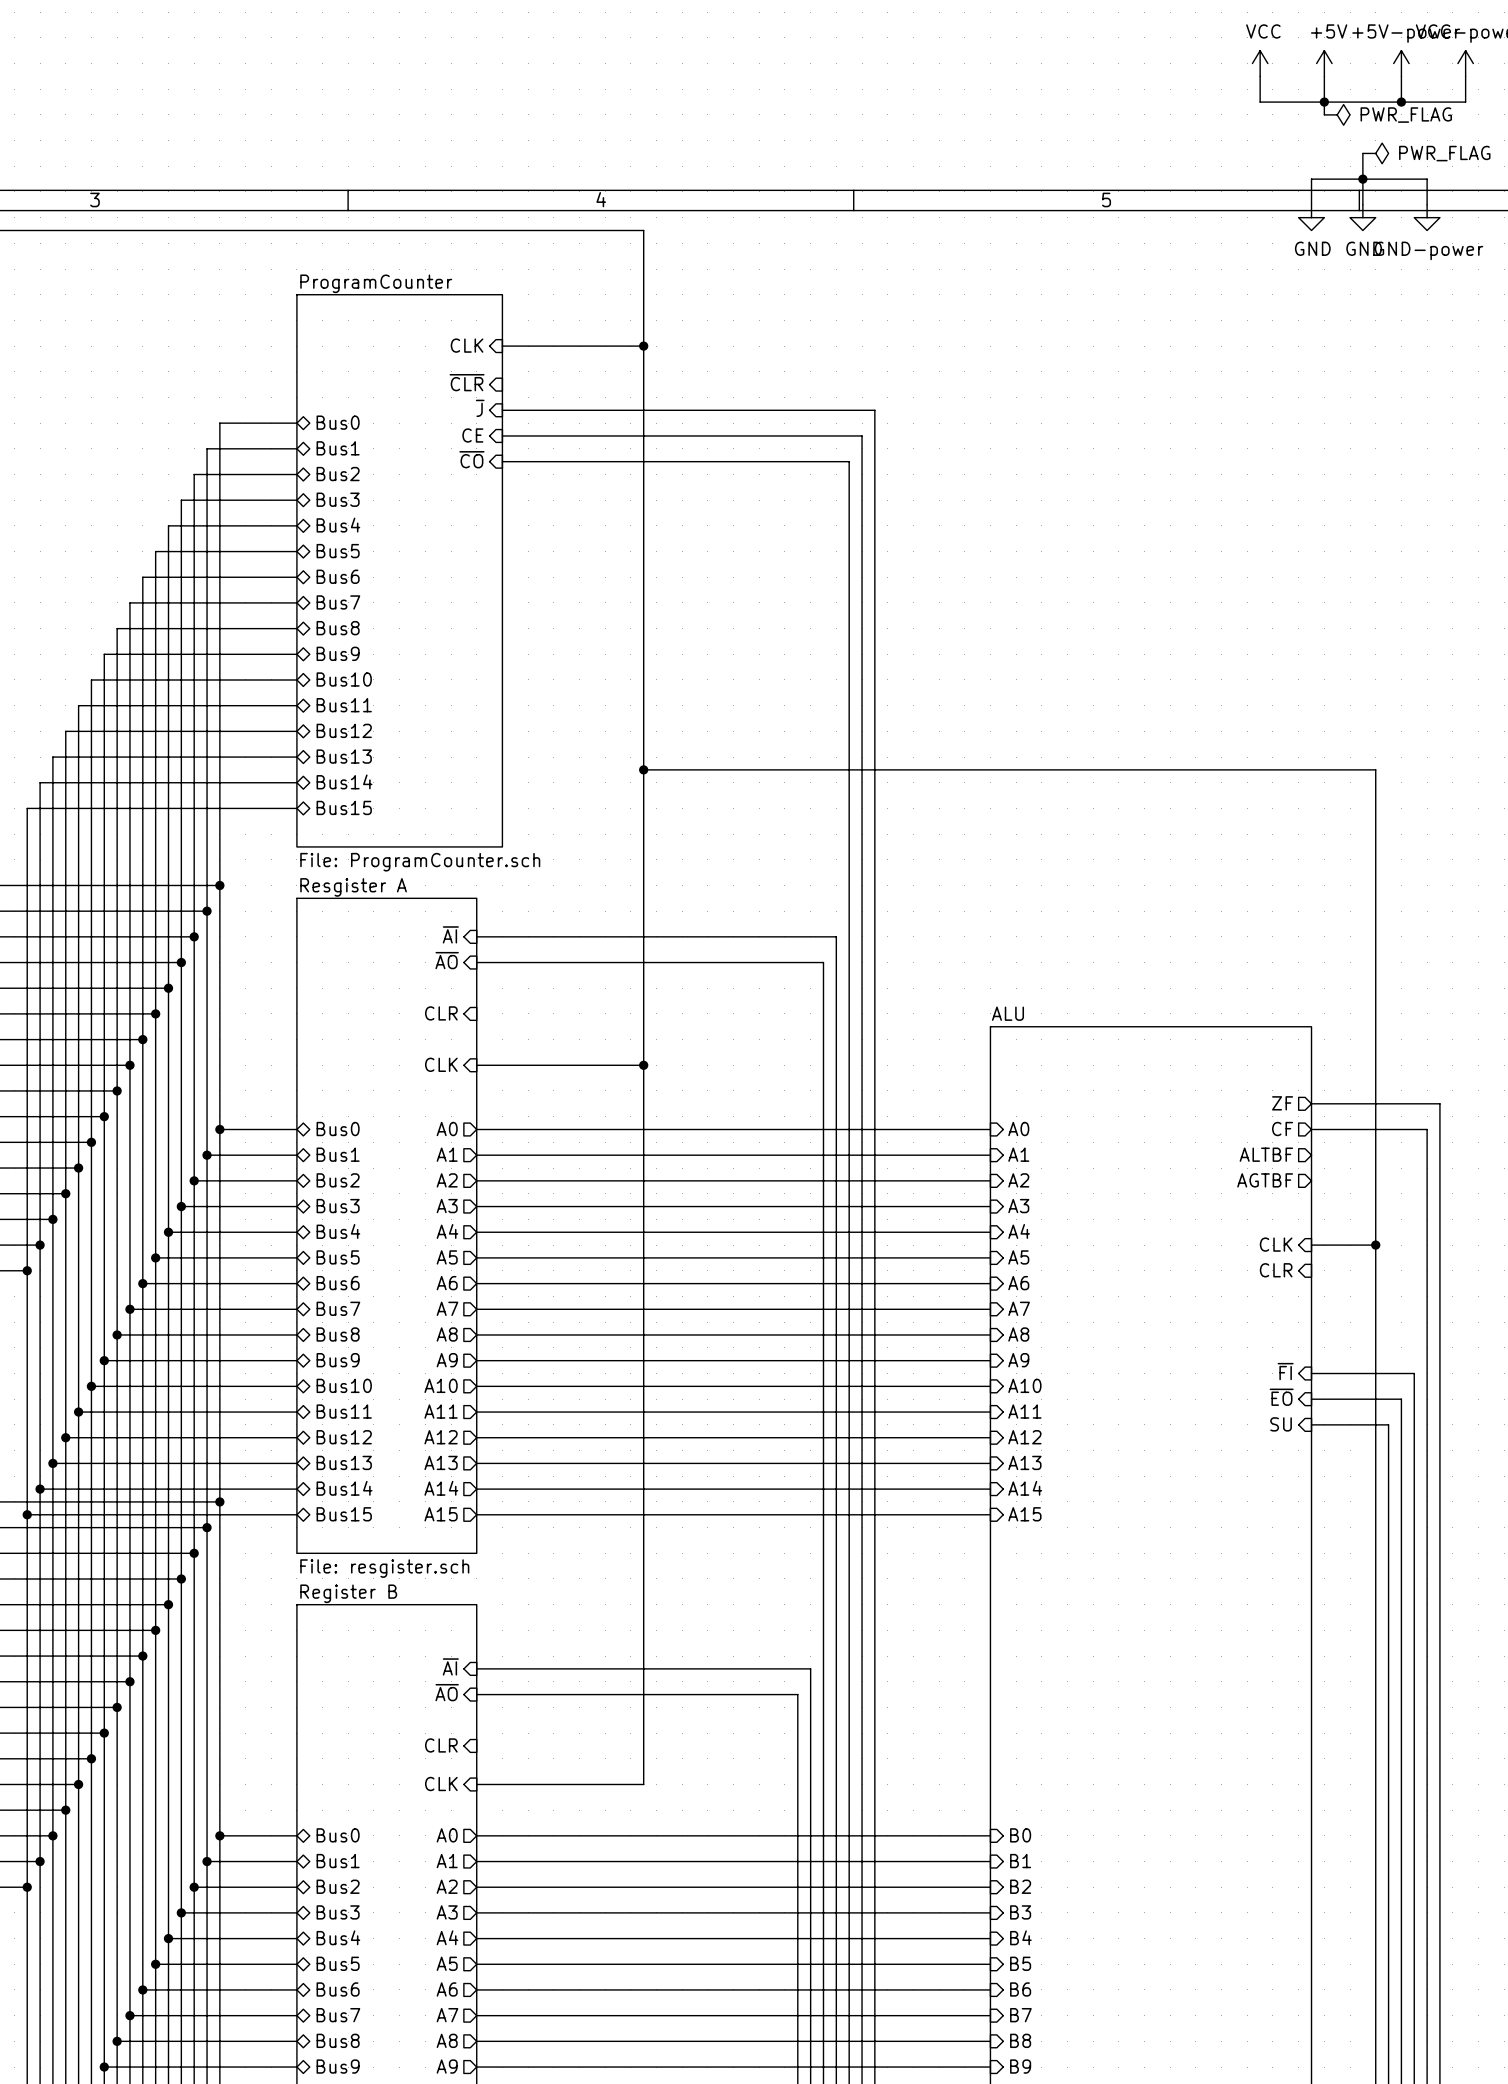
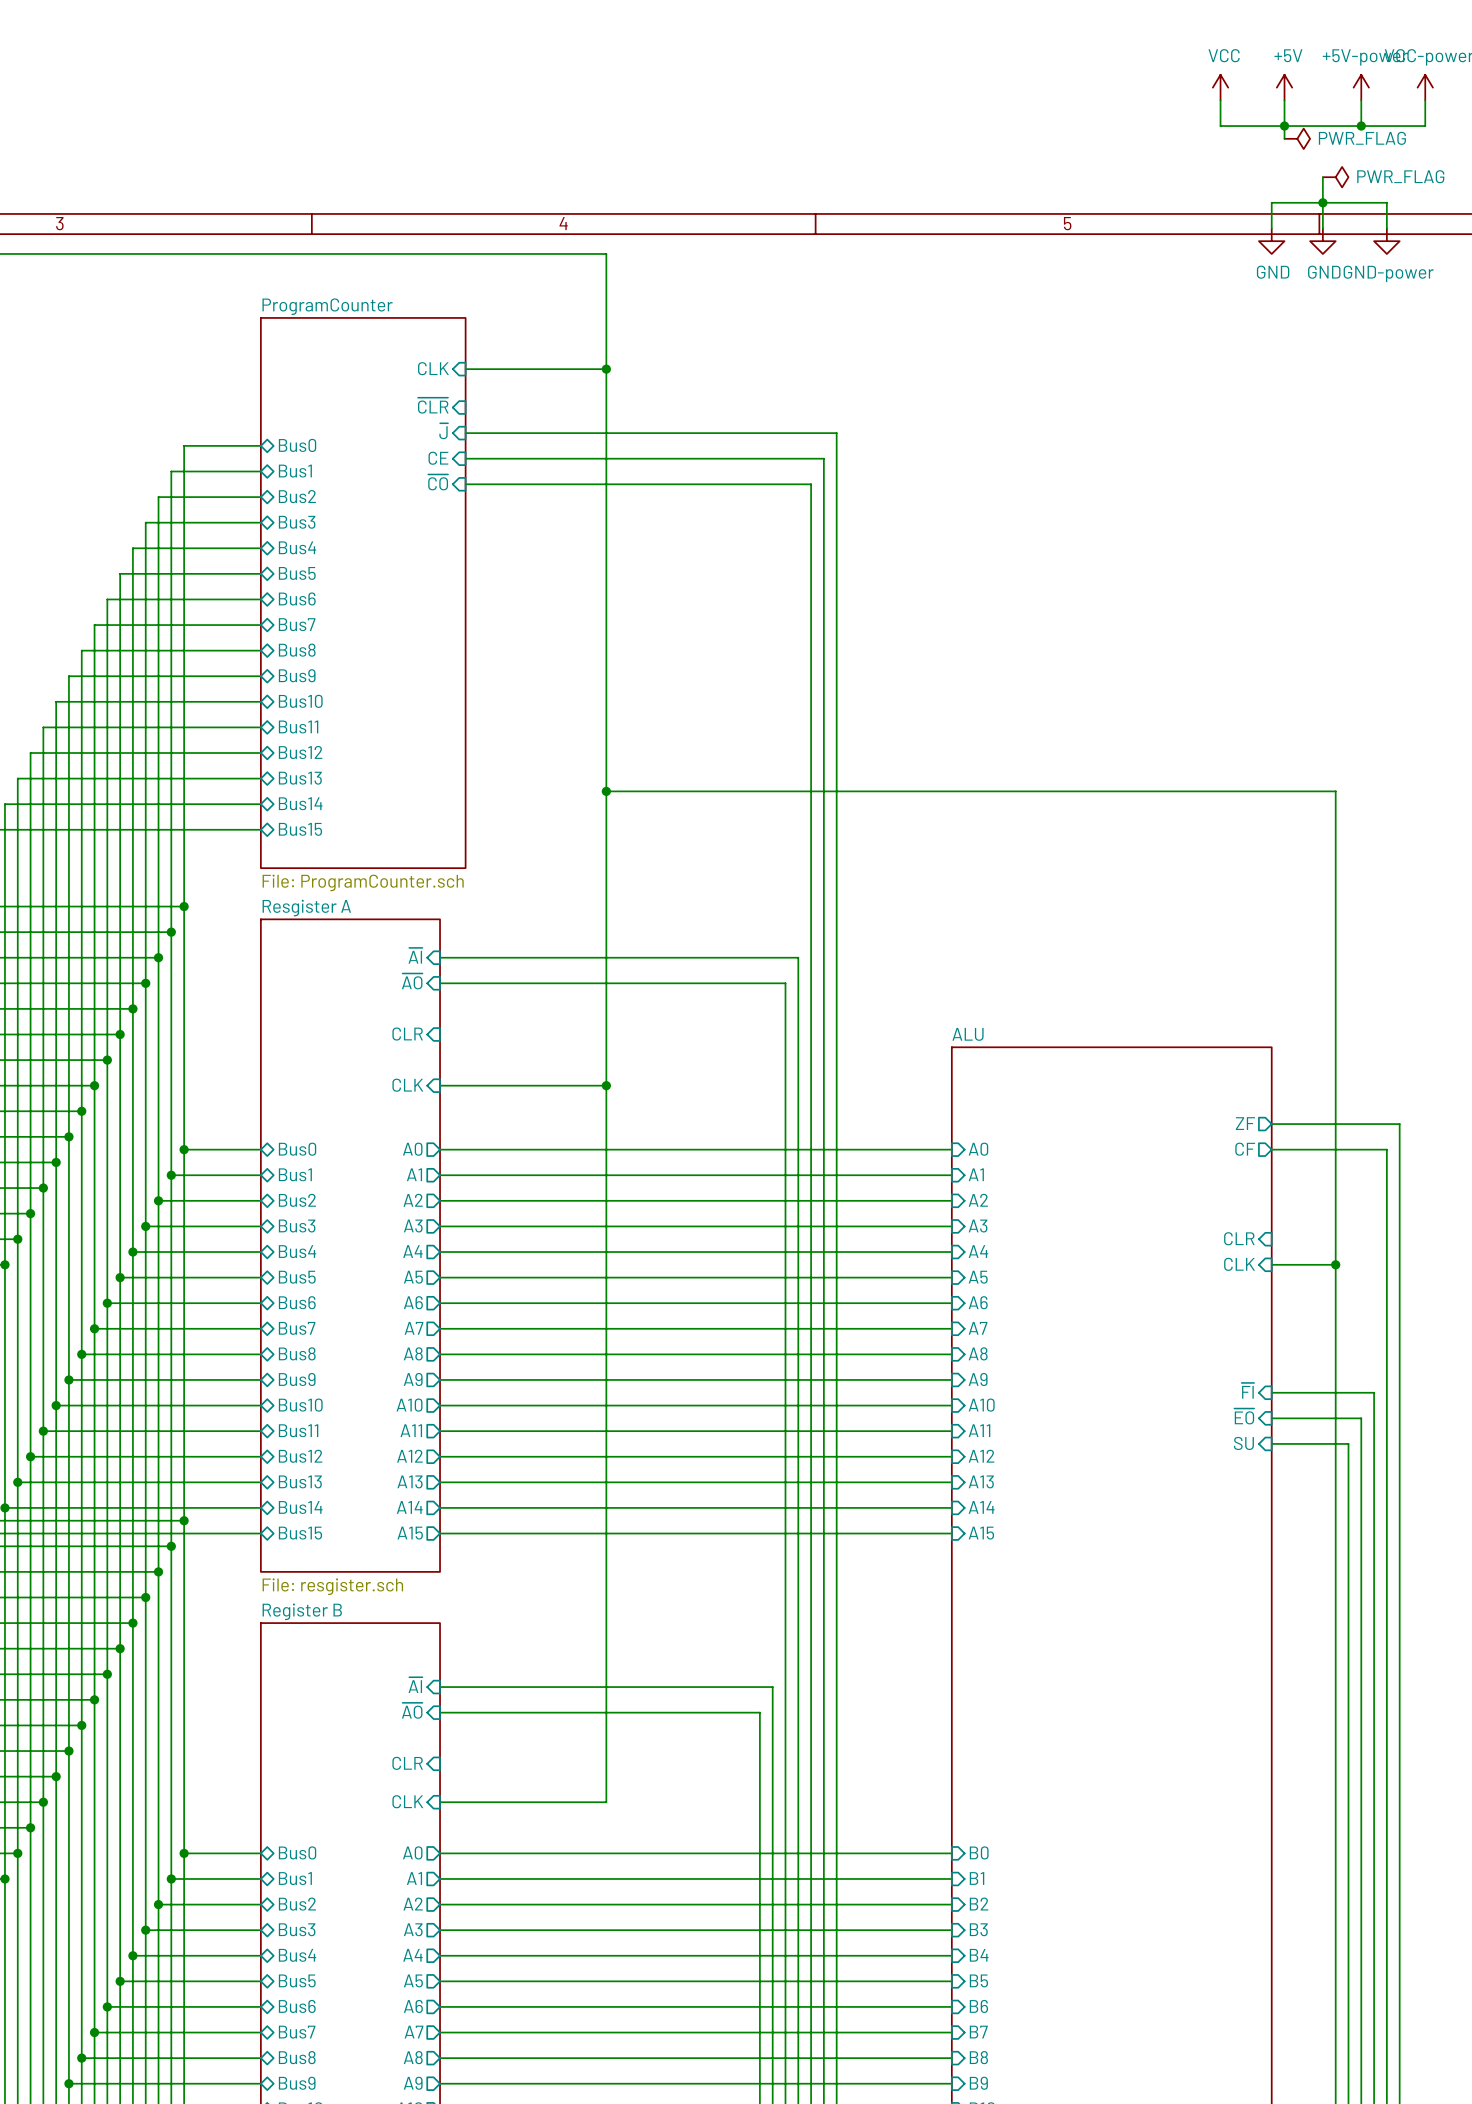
sheet pin: ALTBF (1266, 1154) -> none
sheet pin: AGTBF (1265, 1180) -> none
sheet pin position: CLR (1276, 1270) -> CLR (1239, 1238)

